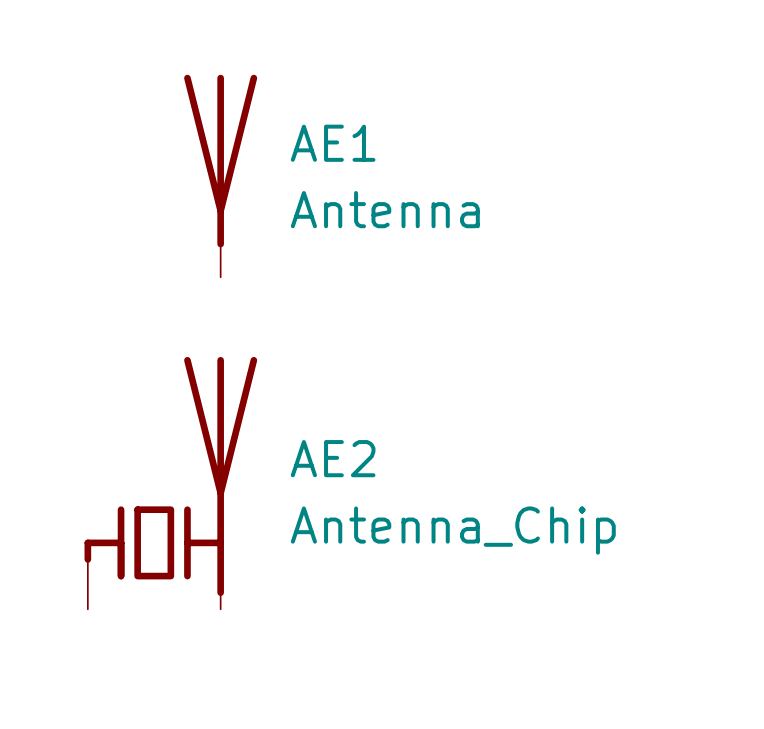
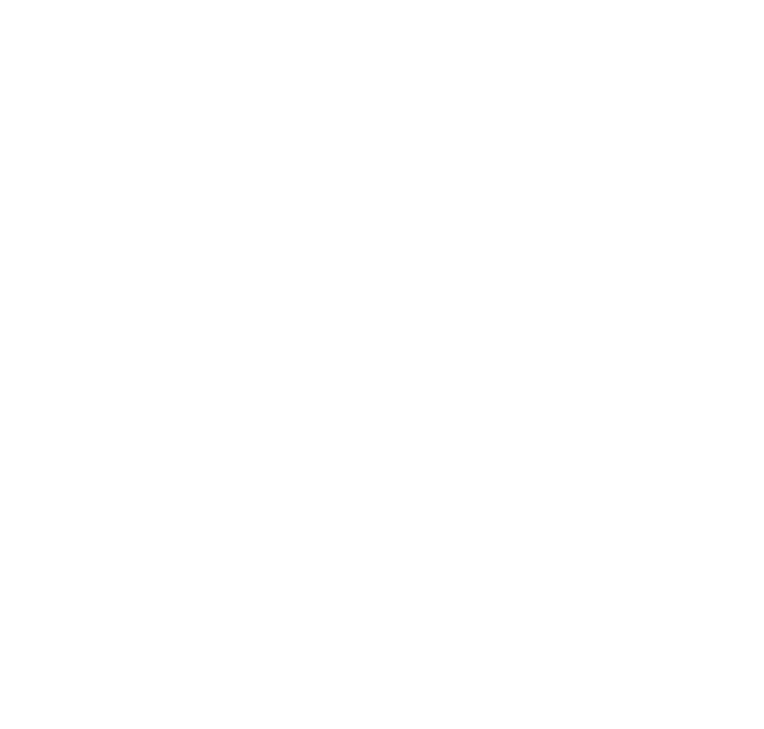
AE1: Antenna (220, 176) -> none
AE2: Antenna_Chip (170, 483) -> none

